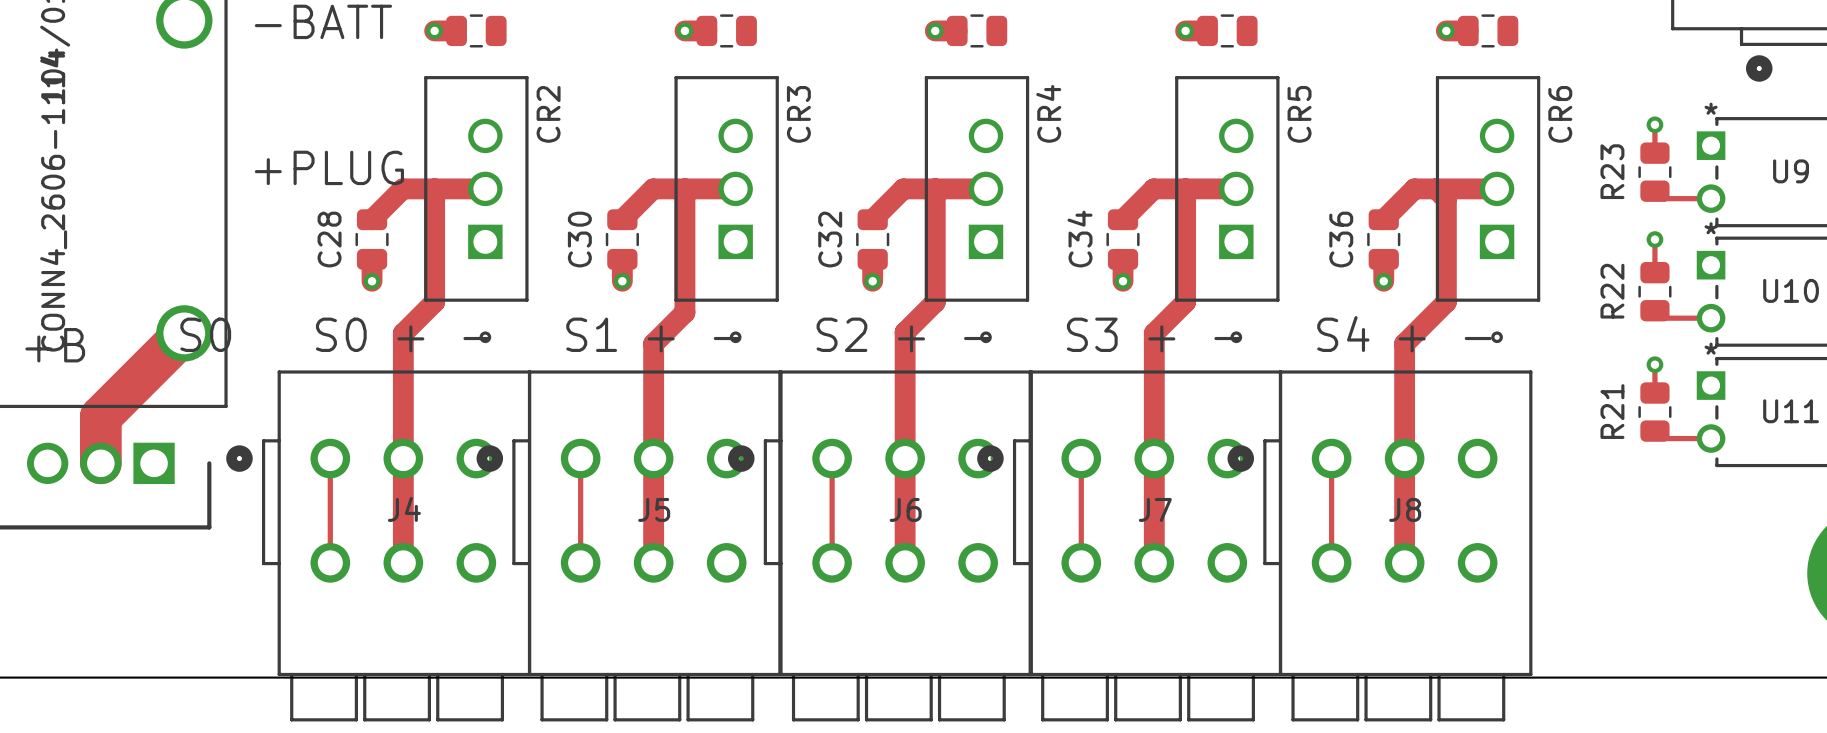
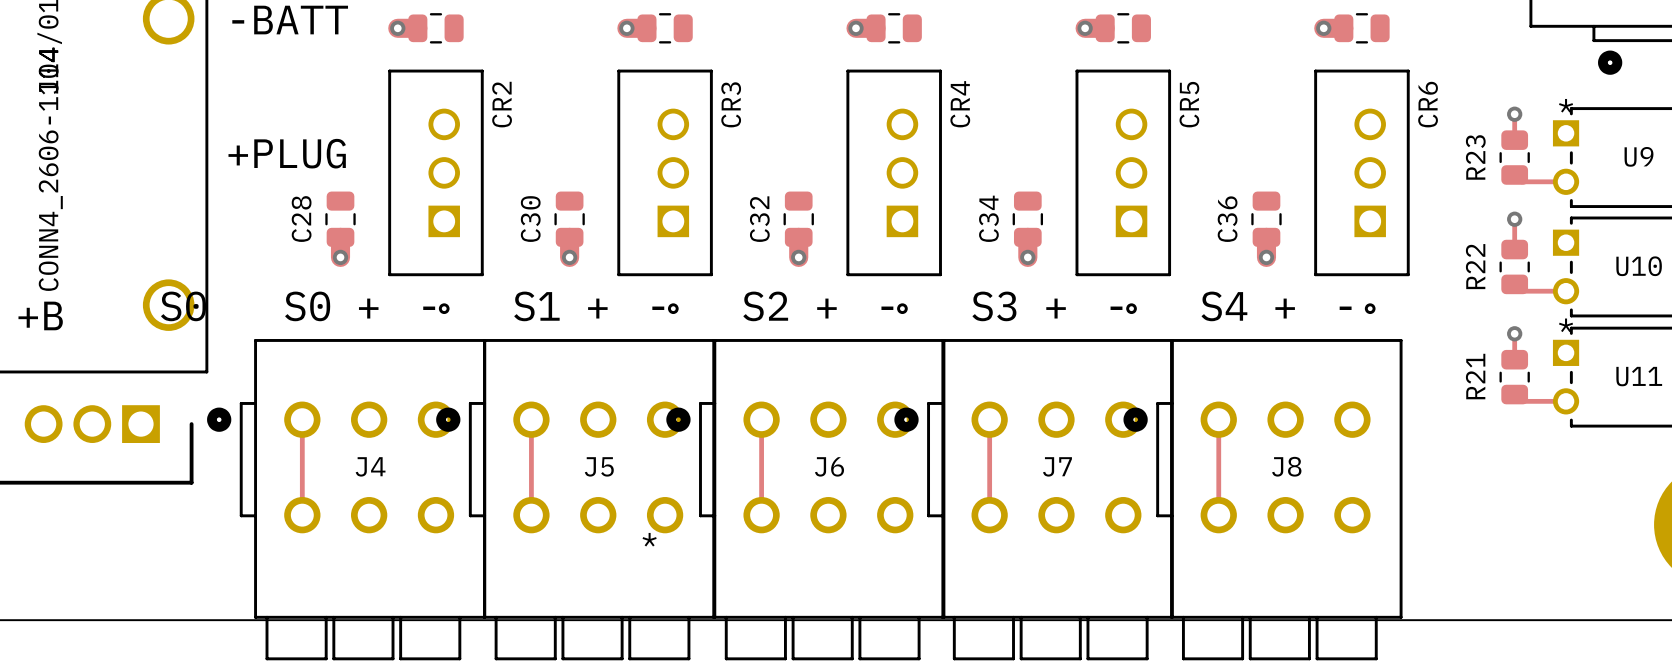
track: (434, 188) (434, 302) (403, 333) (403, 562) -> none
track: (485, 188) (402, 188) (372, 219) -> none
track: (684, 188) (684, 312) (653, 343) (653, 562) -> none
track: (735, 188) (653, 188) (622, 219) -> none
track: (935, 188) (935, 302) (905, 332) (905, 562) -> none
track: (985, 188) (903, 188) (872, 219) -> none
track: (1185, 188) (1185, 302) (1154, 333) (1154, 562) -> none
track: (1236, 188) (1153, 188) (1123, 219) -> none
track: (1435, 188) (1446, 199) (1446, 302) (1404, 343) (1404, 562) -> none
track: (1497, 188) (1414, 188) (1383, 219) -> none
U10 text position: * (1711, 228) -> * (649, 539)
track: (184, 333) (100, 416) (100, 463) -> none

